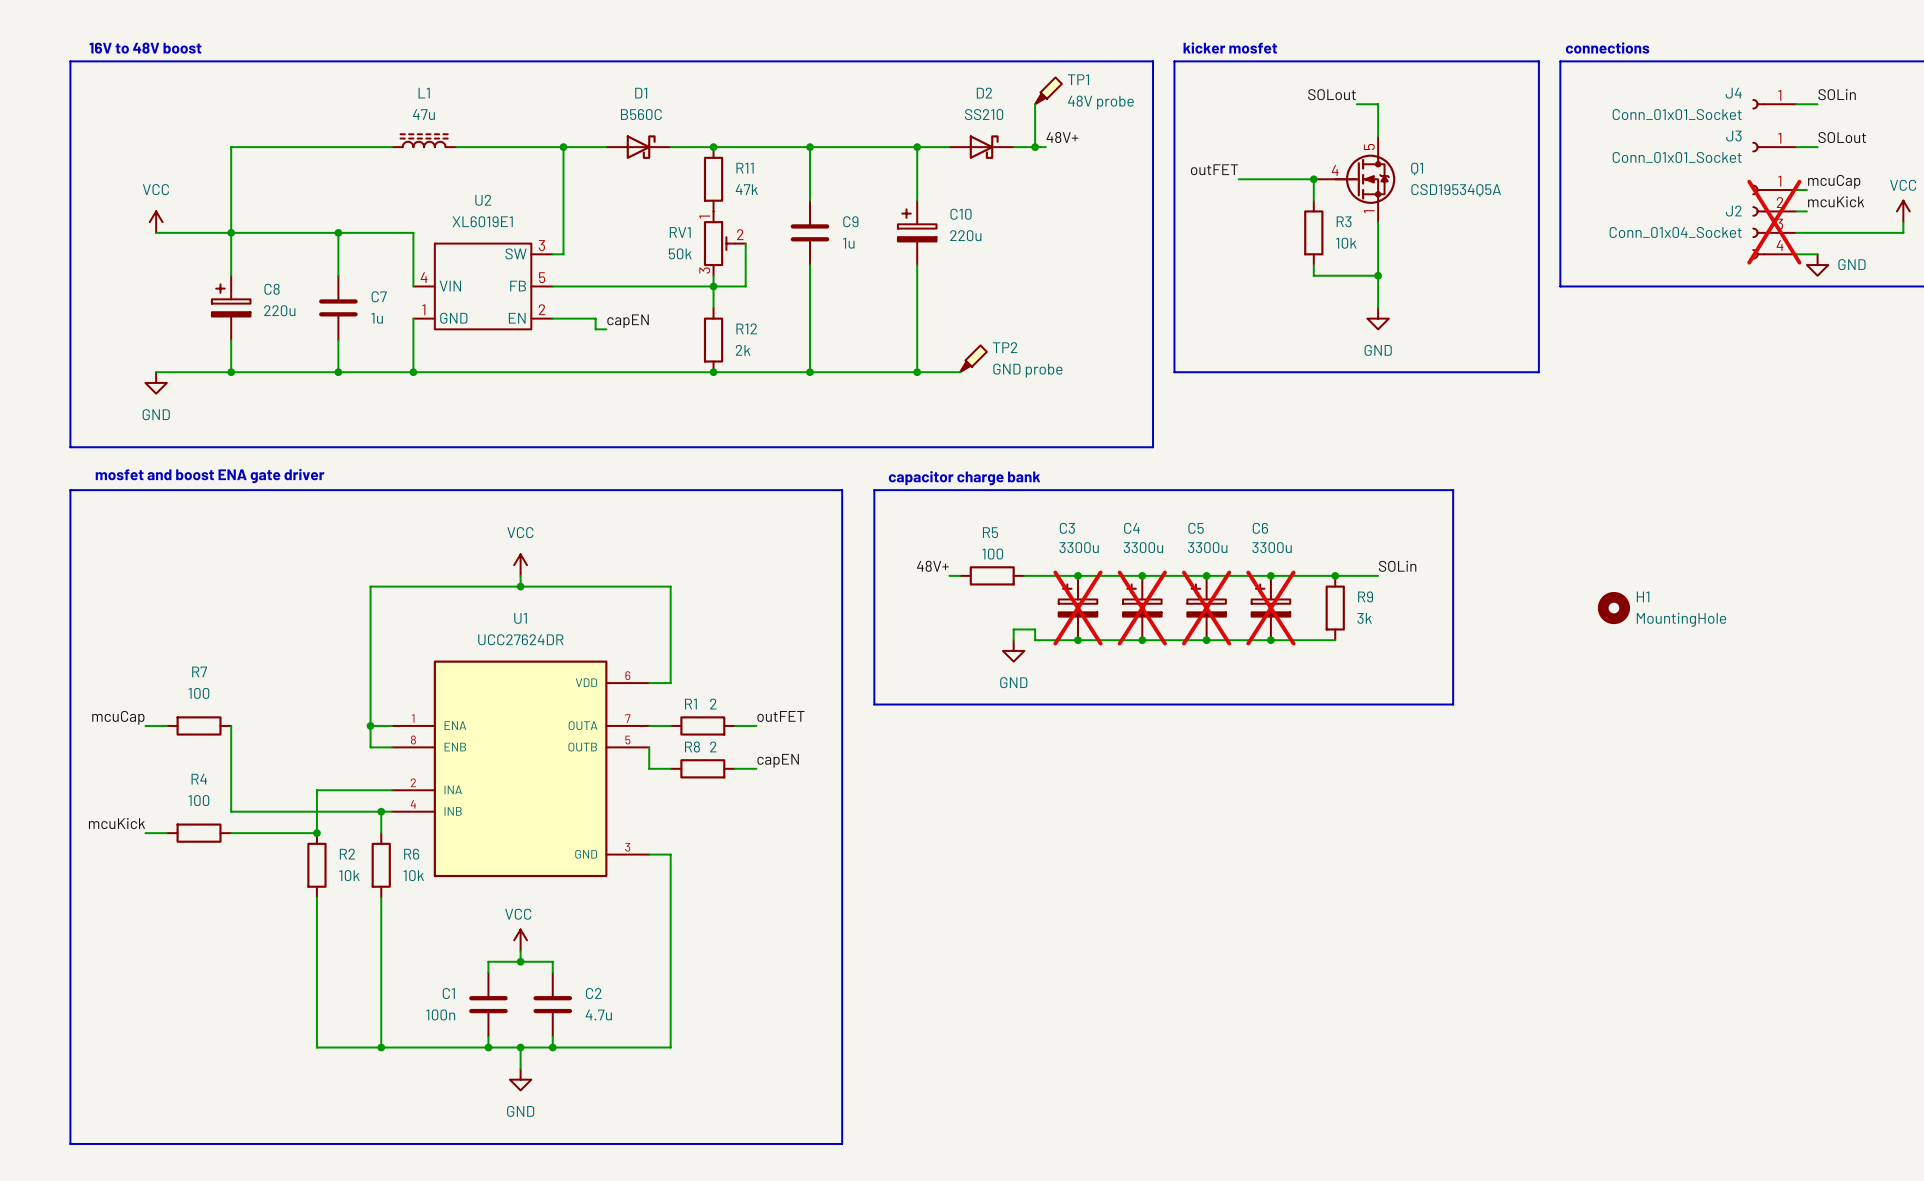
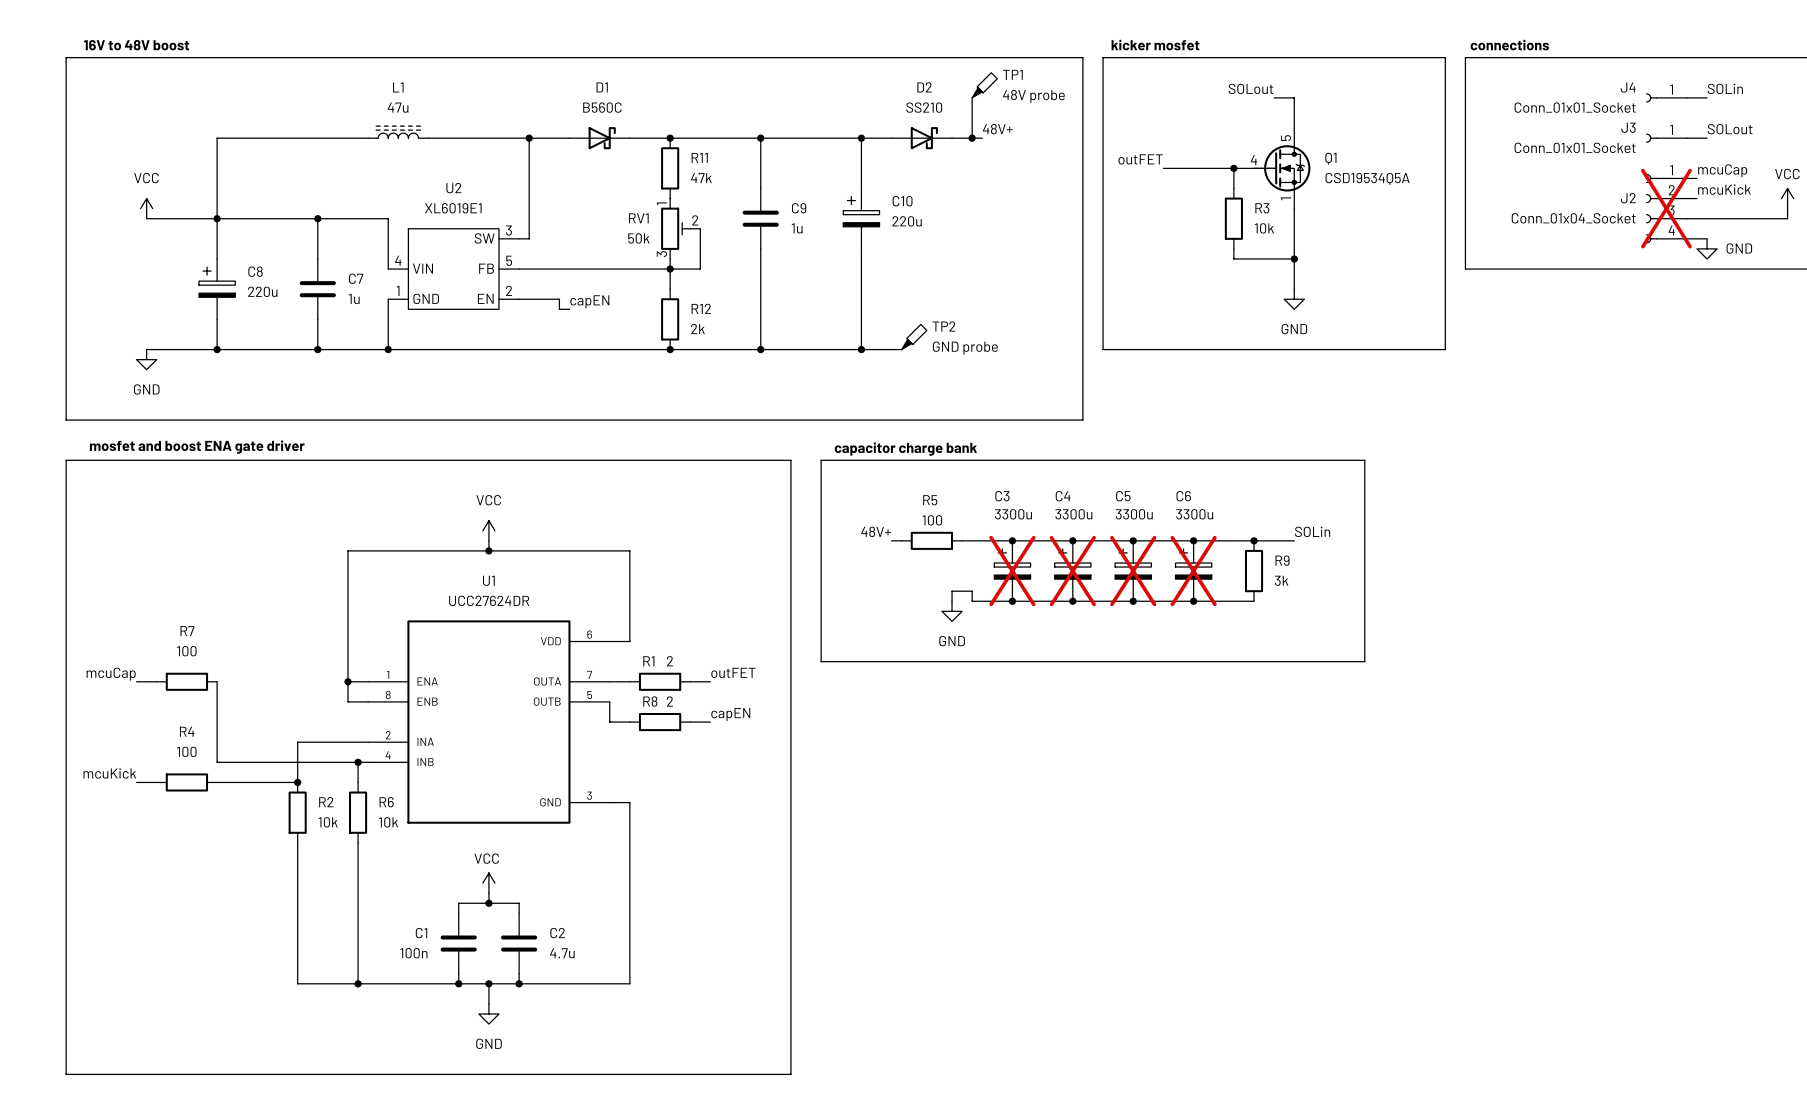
H1: MountingHole (1613, 608) -> none

